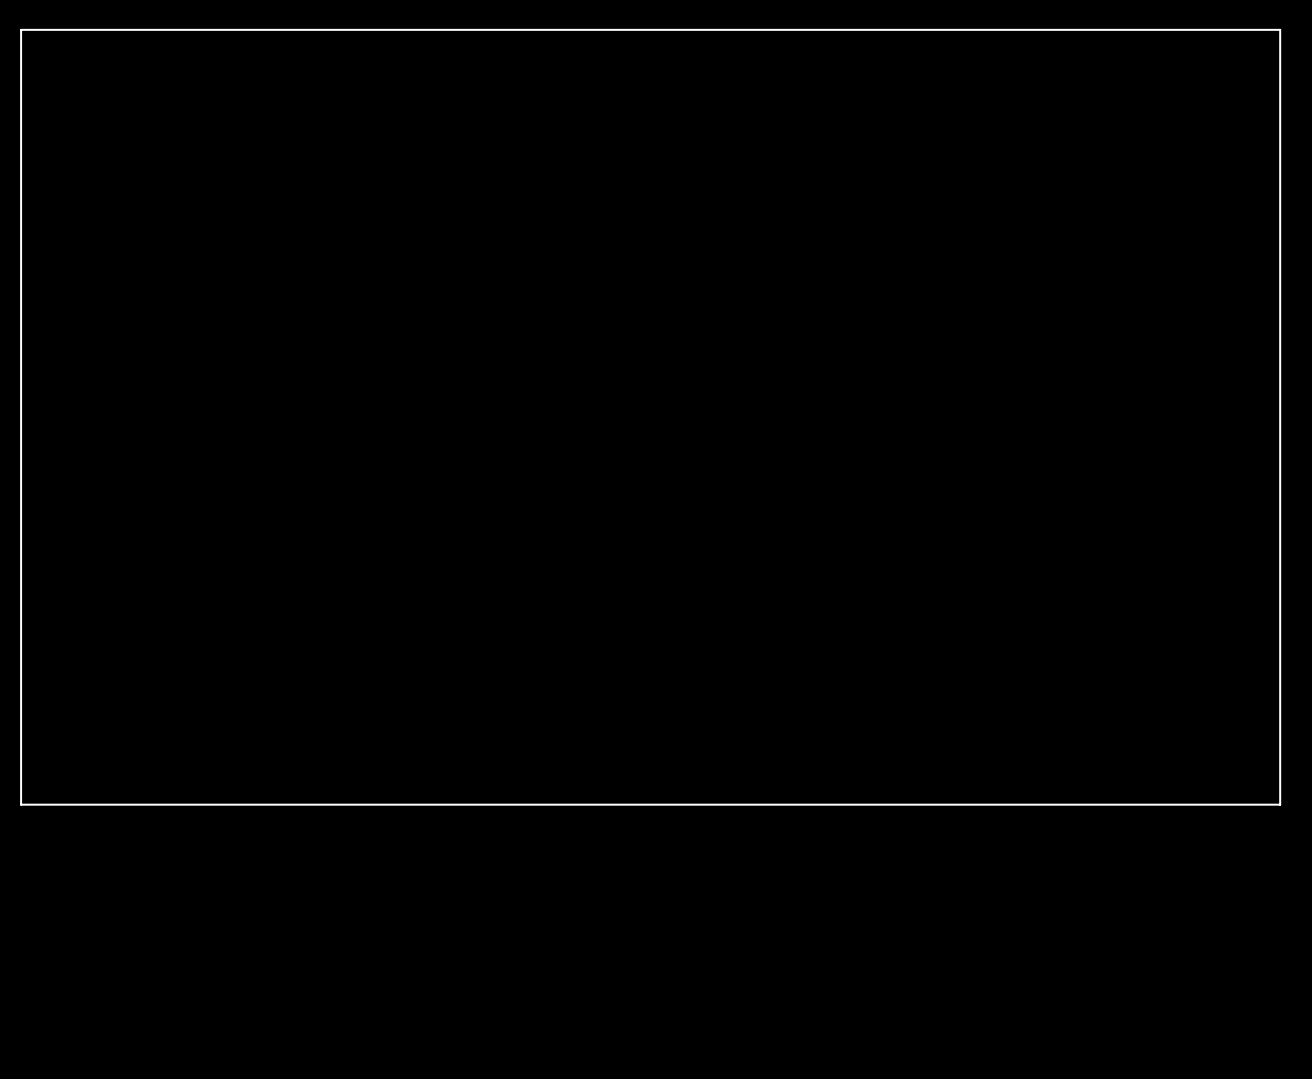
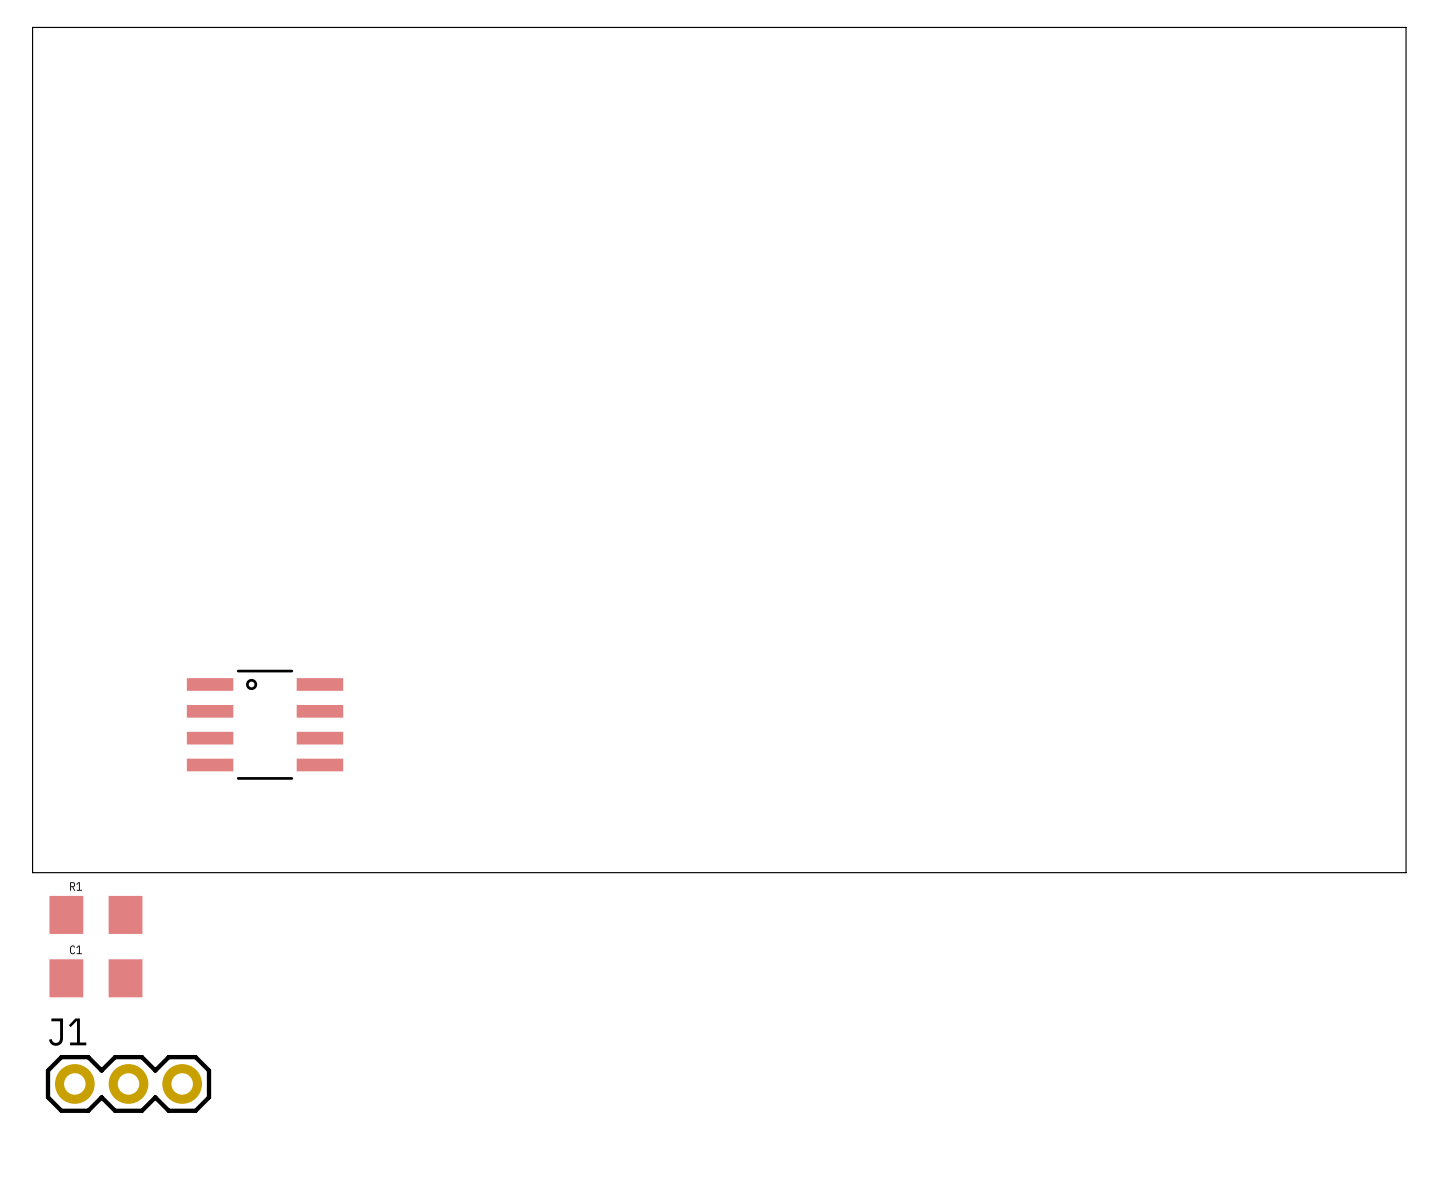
part: none -> (265, 724)
R1: none -> (95, 914)
C1: none -> (95, 978)
J1: none -> (128, 1083)

